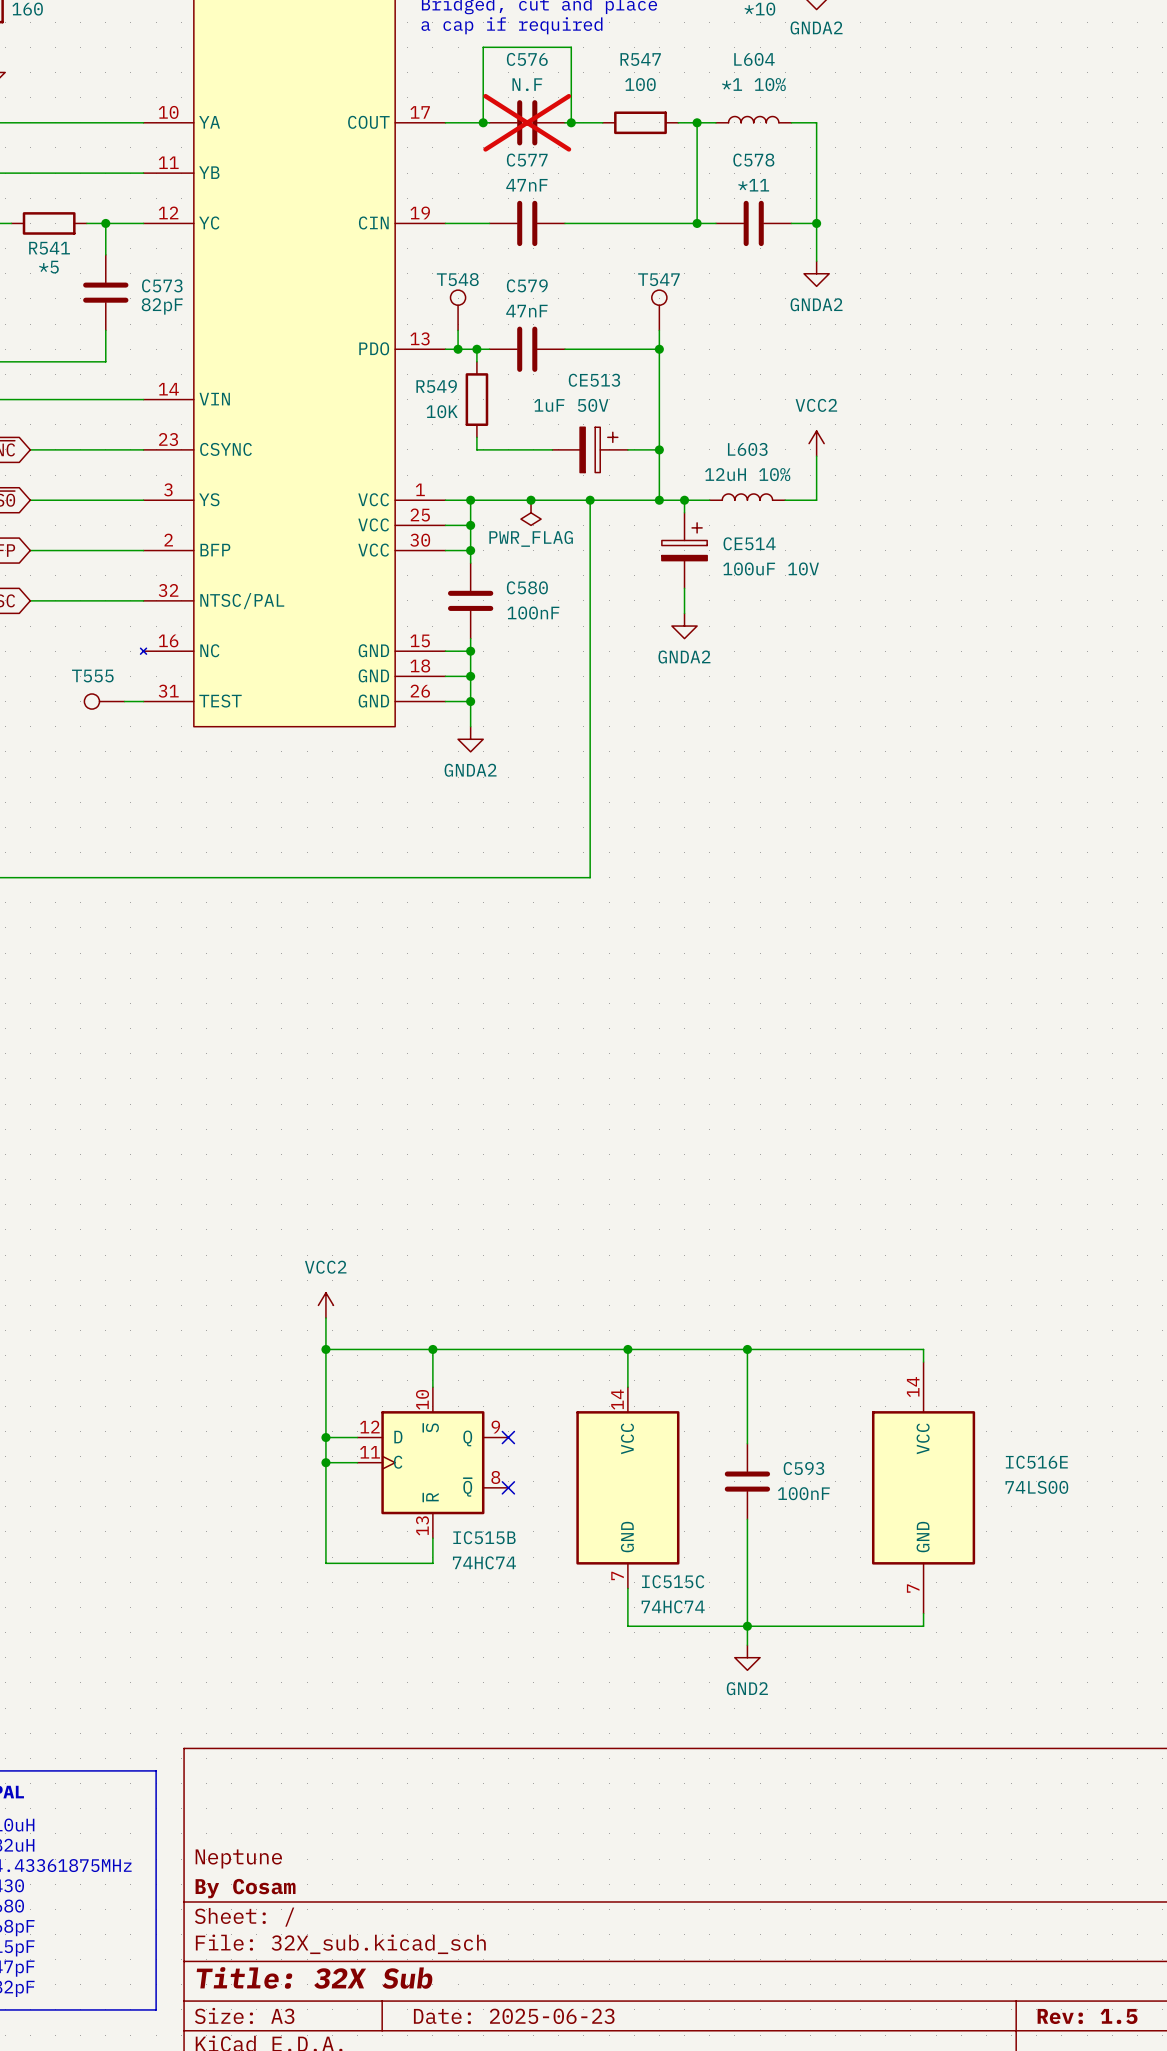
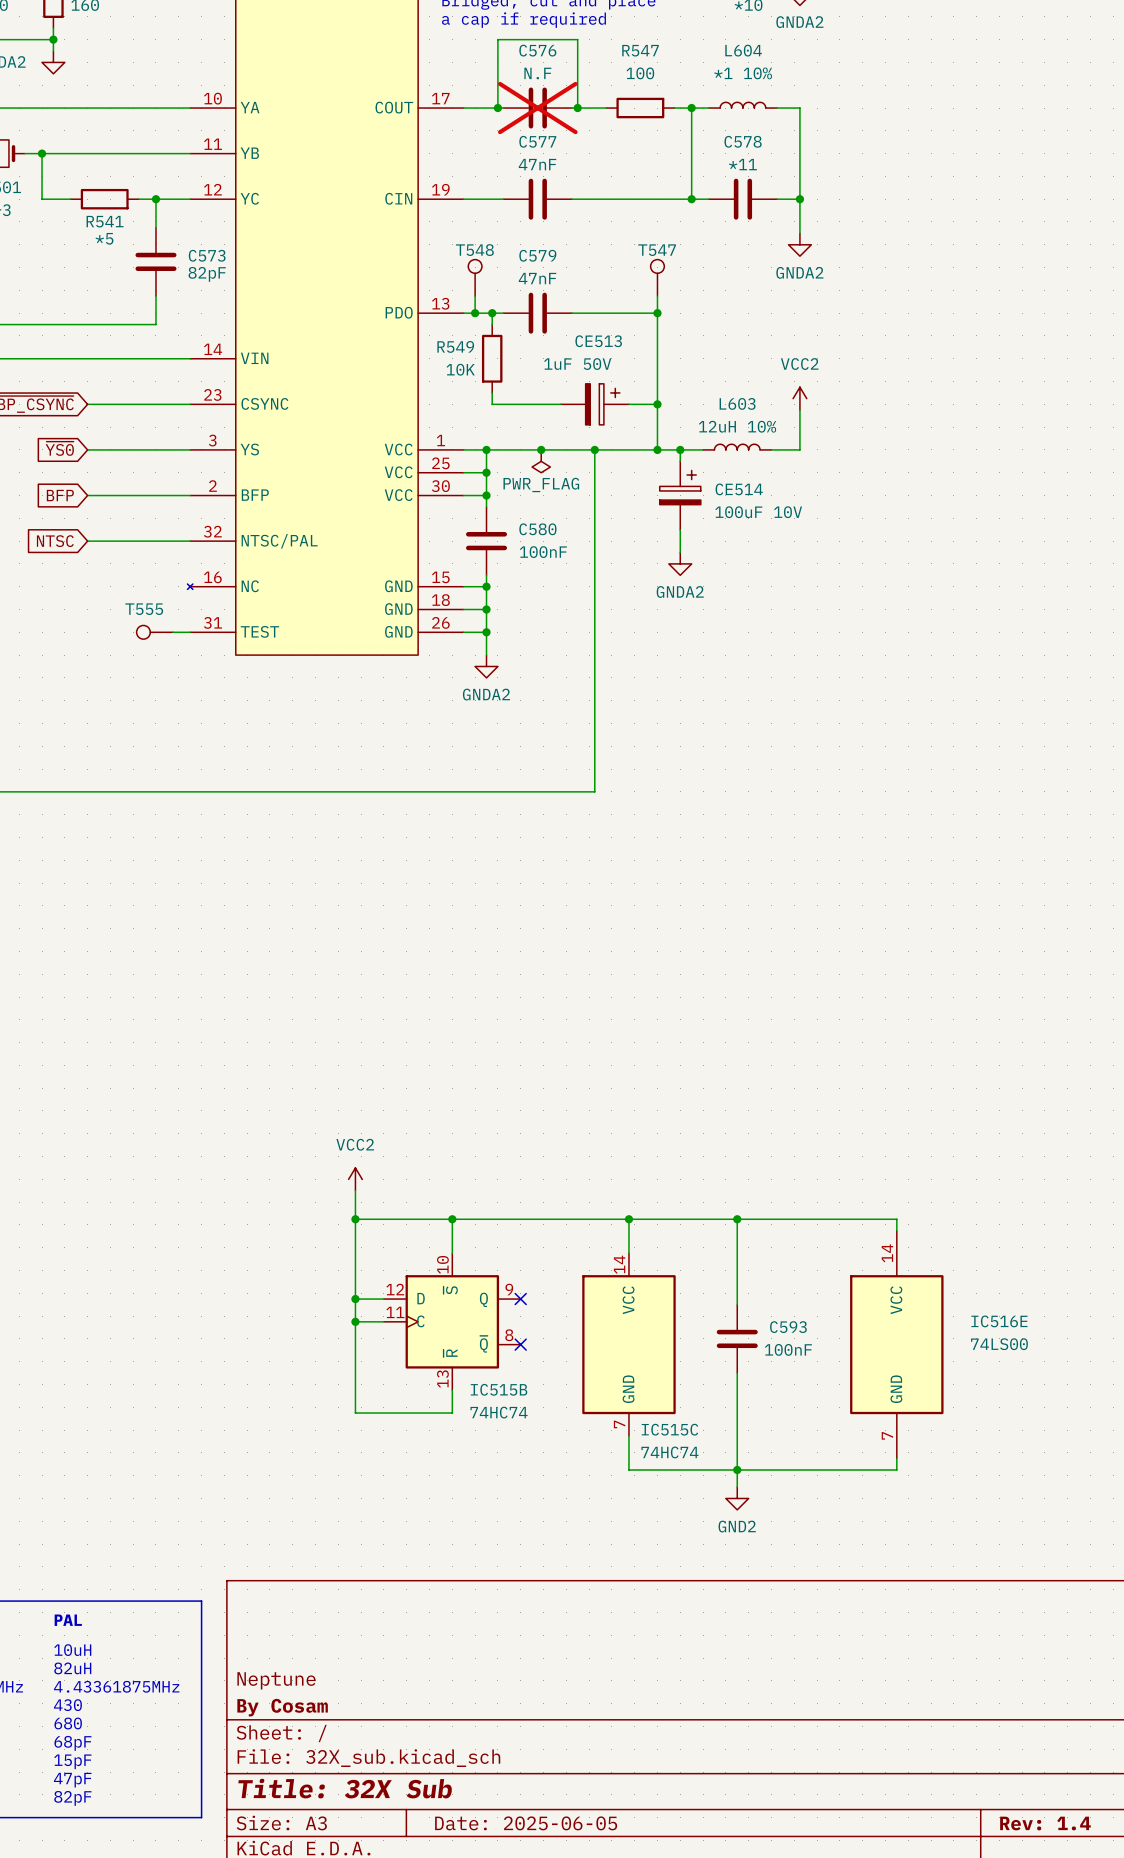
title block: Date: 2025-06-23 (514, 2016) -> Date: 2025-06-05 (526, 1823)
title block: Rev: 1.5 (1087, 2016) -> Rev: 1.4 (1045, 1823)

